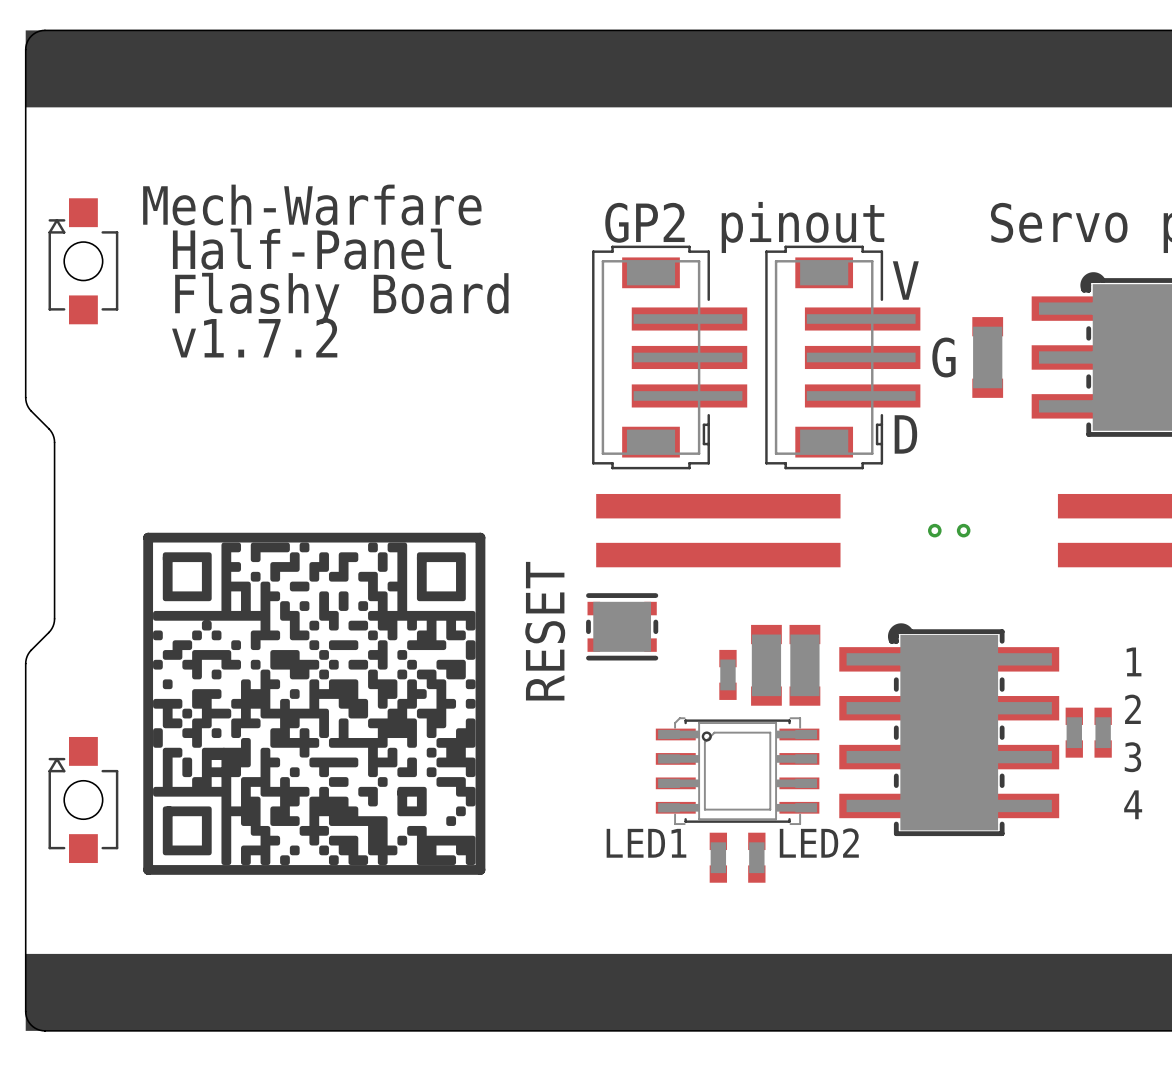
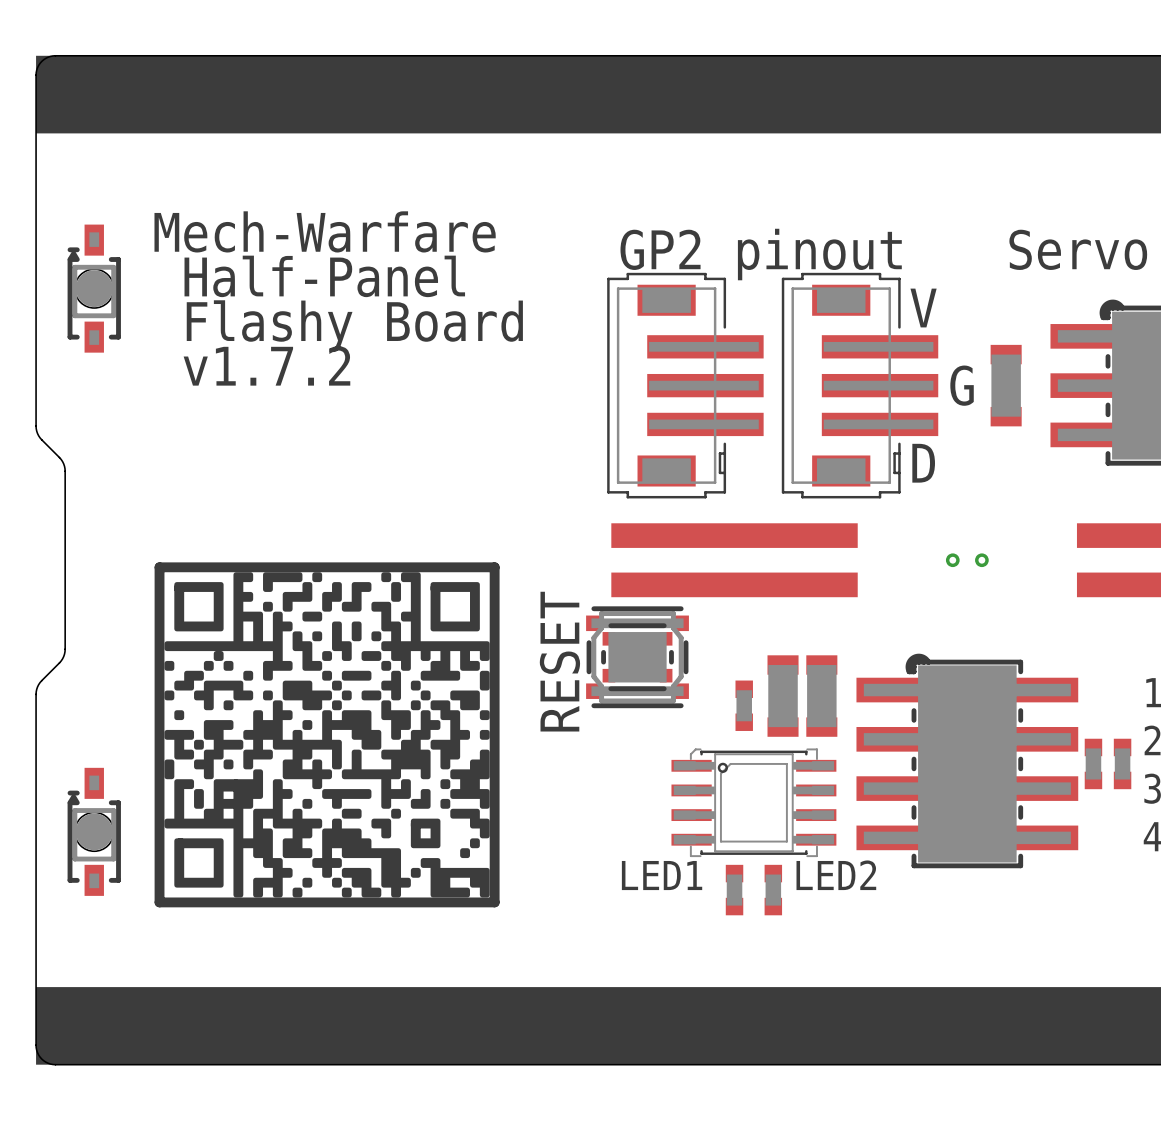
part footprint: [48, 198, 119, 325] -> [67, 224, 121, 353]
part: (622, 626) -> none
part: none -> (637, 657)
part: none -> (637, 657)
part footprint: [48, 736, 119, 864] -> [67, 767, 121, 896]

